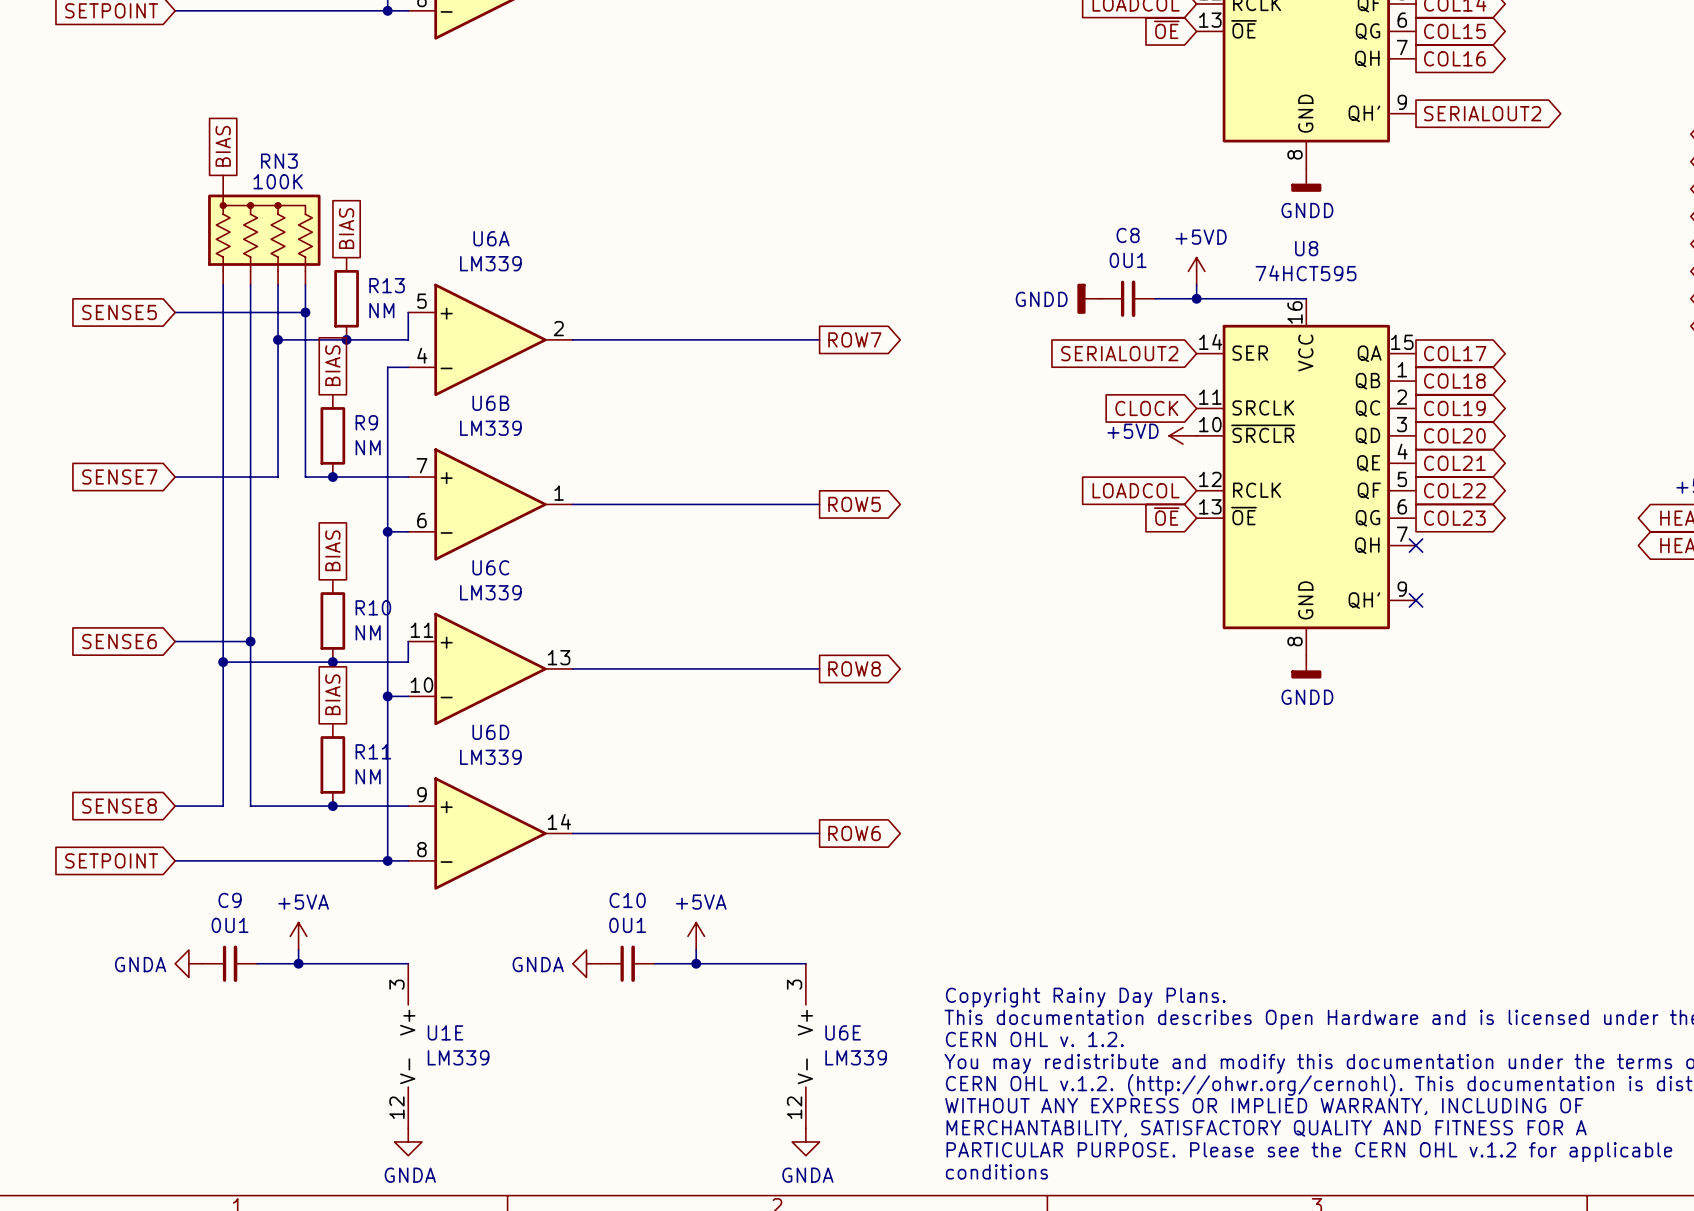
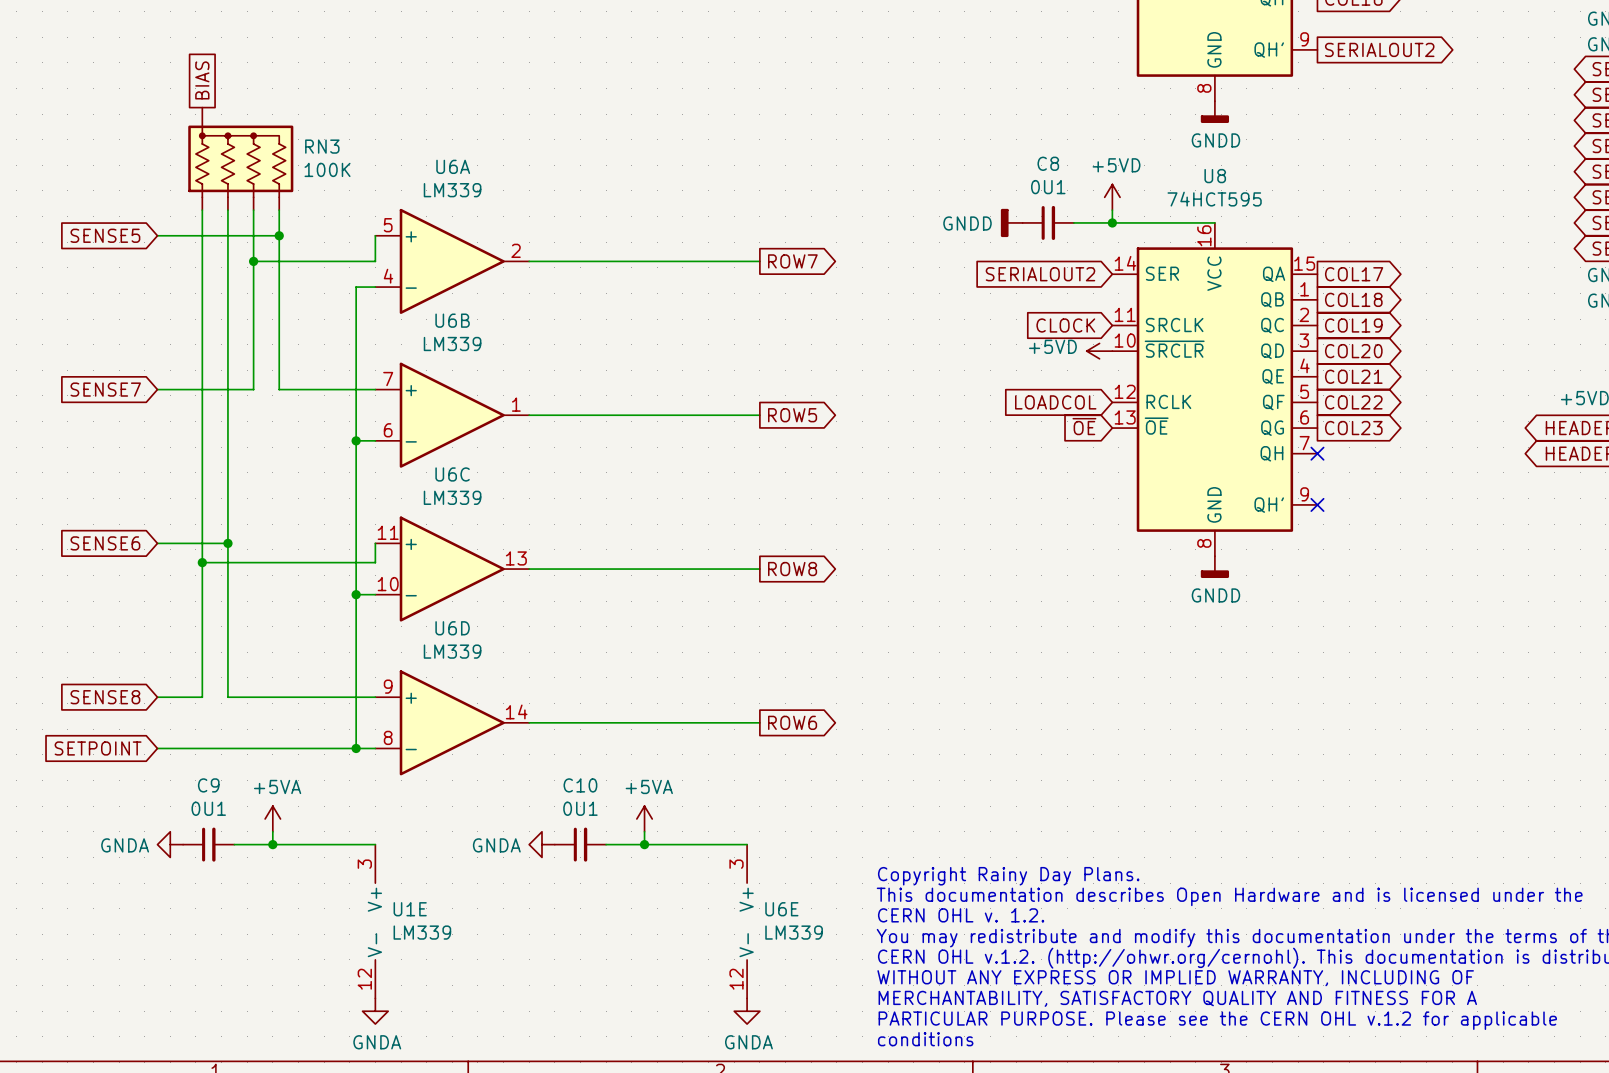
RN3 name position: RN3 (279, 161) -> RN3 (322, 146)
RN3 value position: 100K (278, 181) -> 100K (327, 169)
global label: BIAS (346, 228) -> none
R13: NM (346, 298) -> none
junction: (346, 339) -> none
global label: BIAS (332, 365) -> none
R9: NM (332, 435) -> none
junction: (332, 477) -> none
global label: BIAS (332, 550) -> none
R10: NM (332, 620) -> none
junction: (332, 662) -> none
global label: BIAS (332, 694) -> none
R11: NM (332, 764) -> none
junction: (332, 806) -> none

